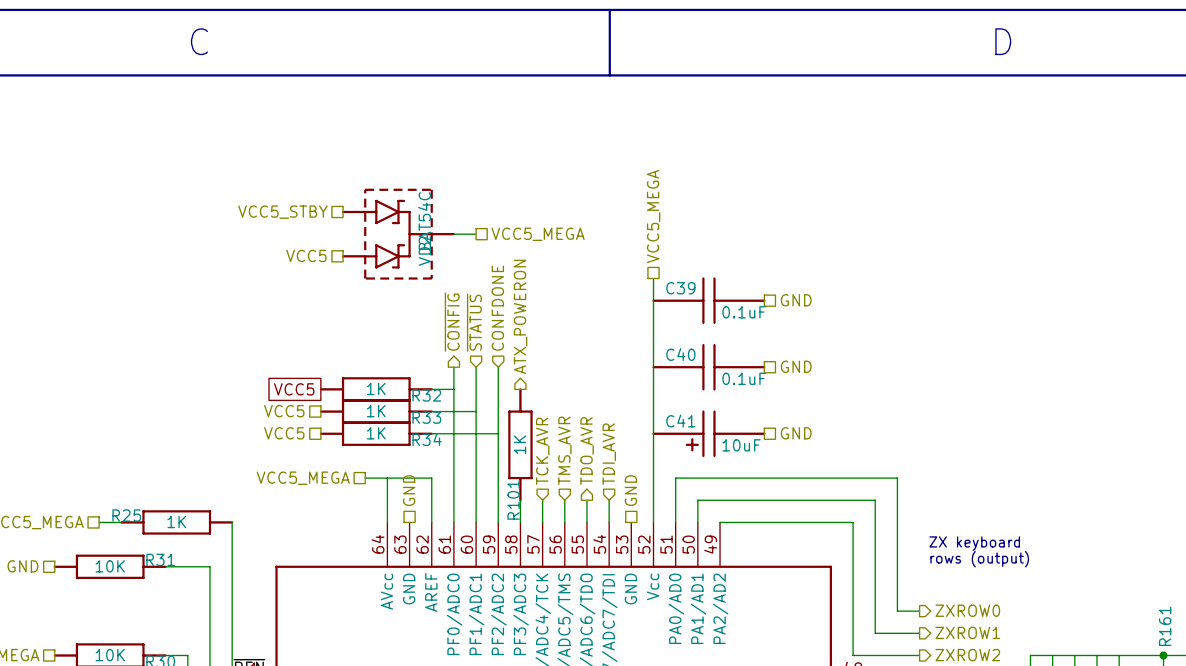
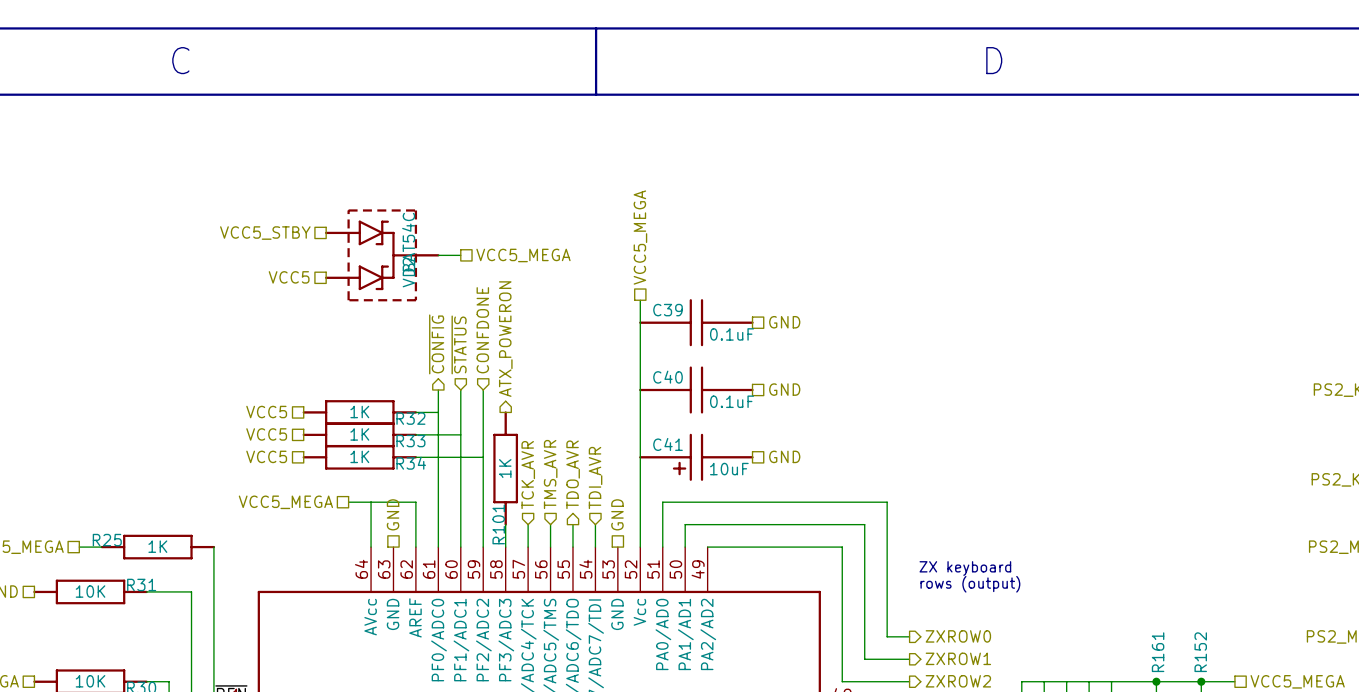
hierarchical label: none -> VCC5 (266, 412)
global label: VCC5 (294, 389) -> none

